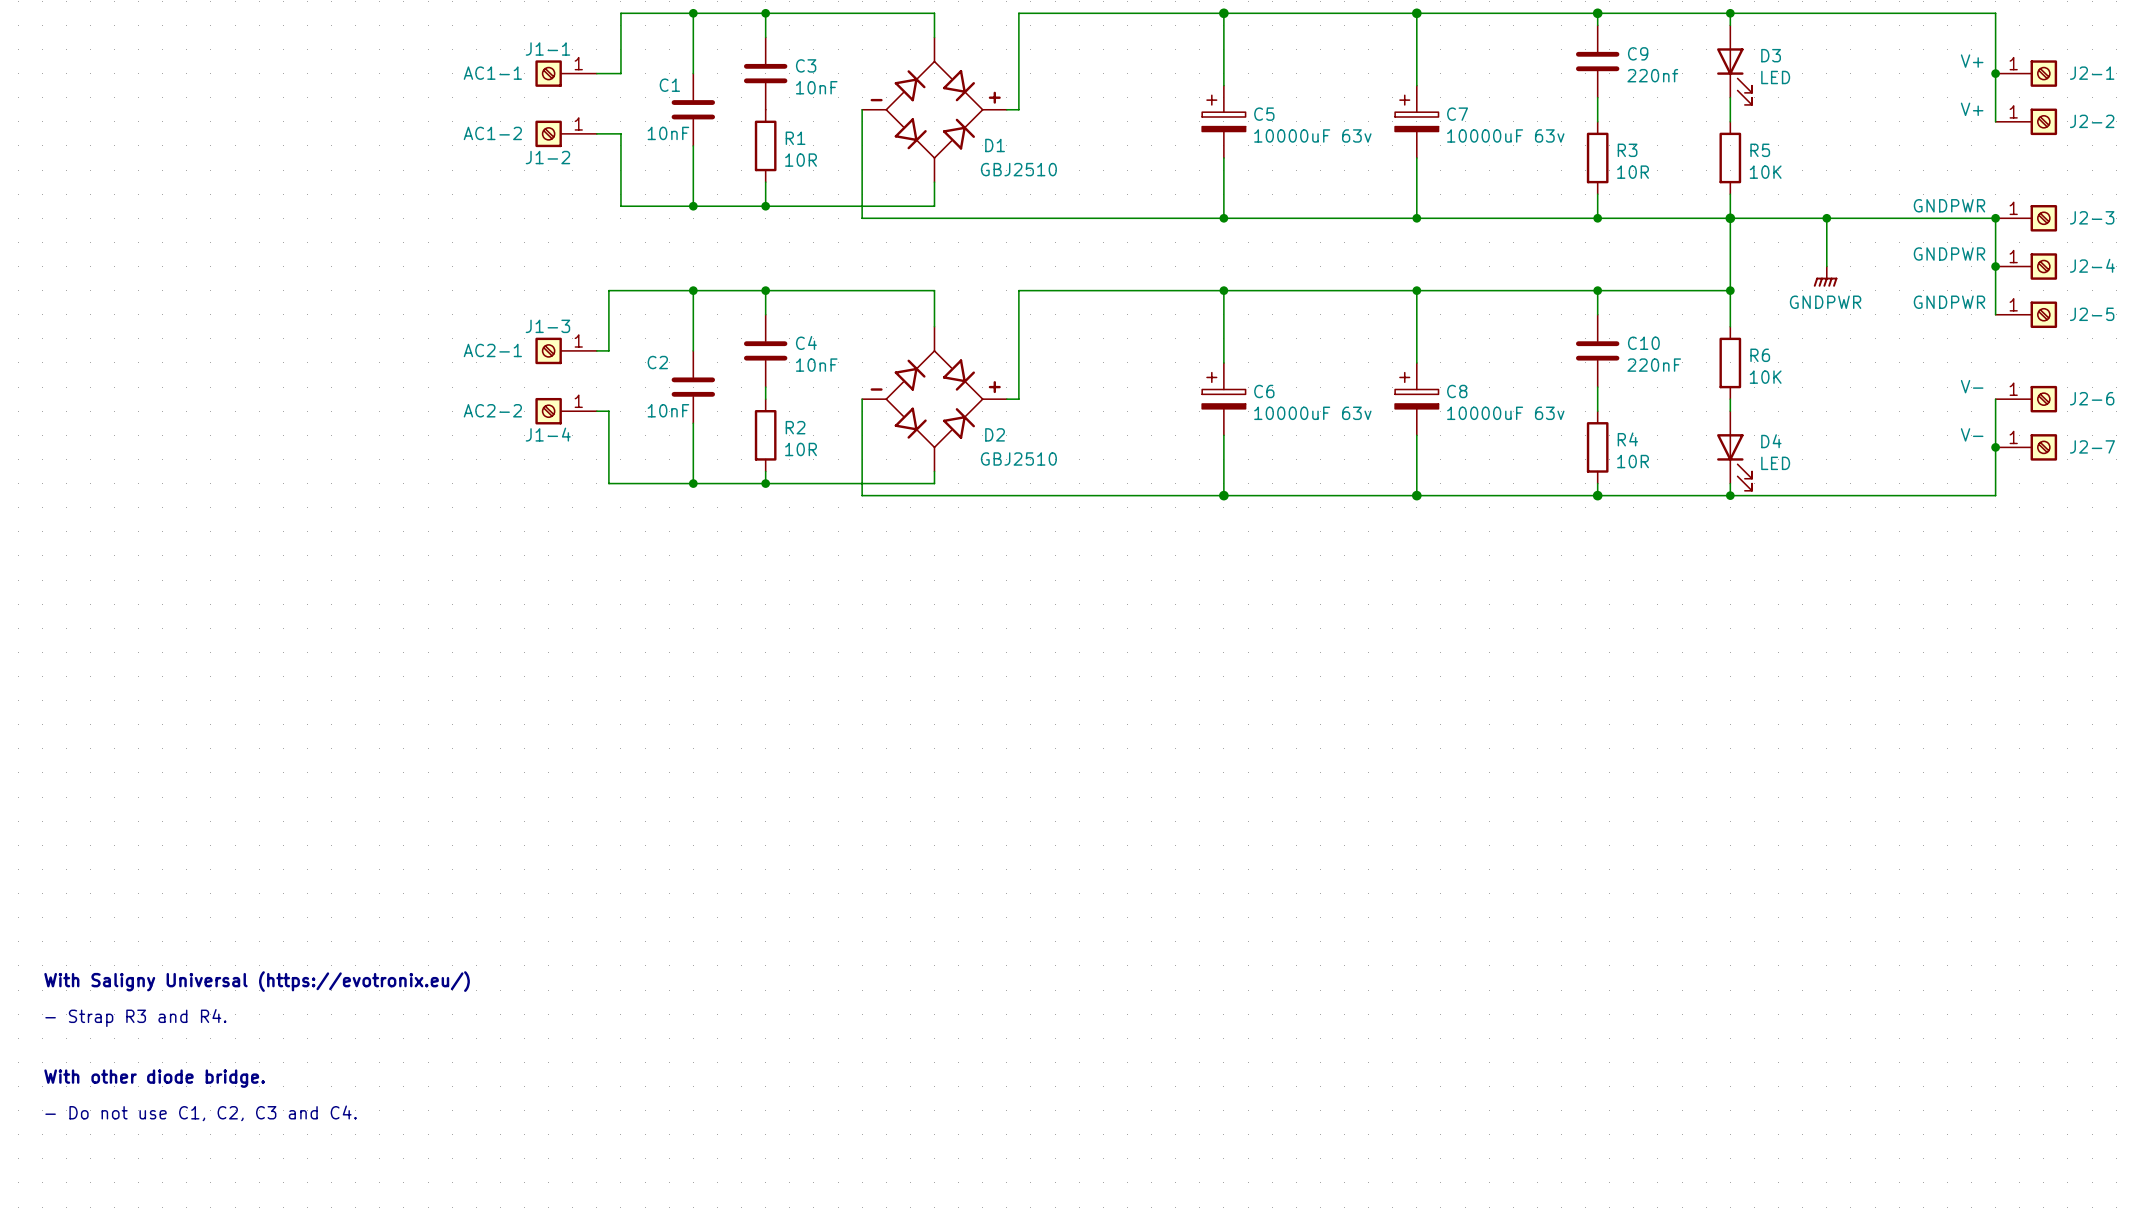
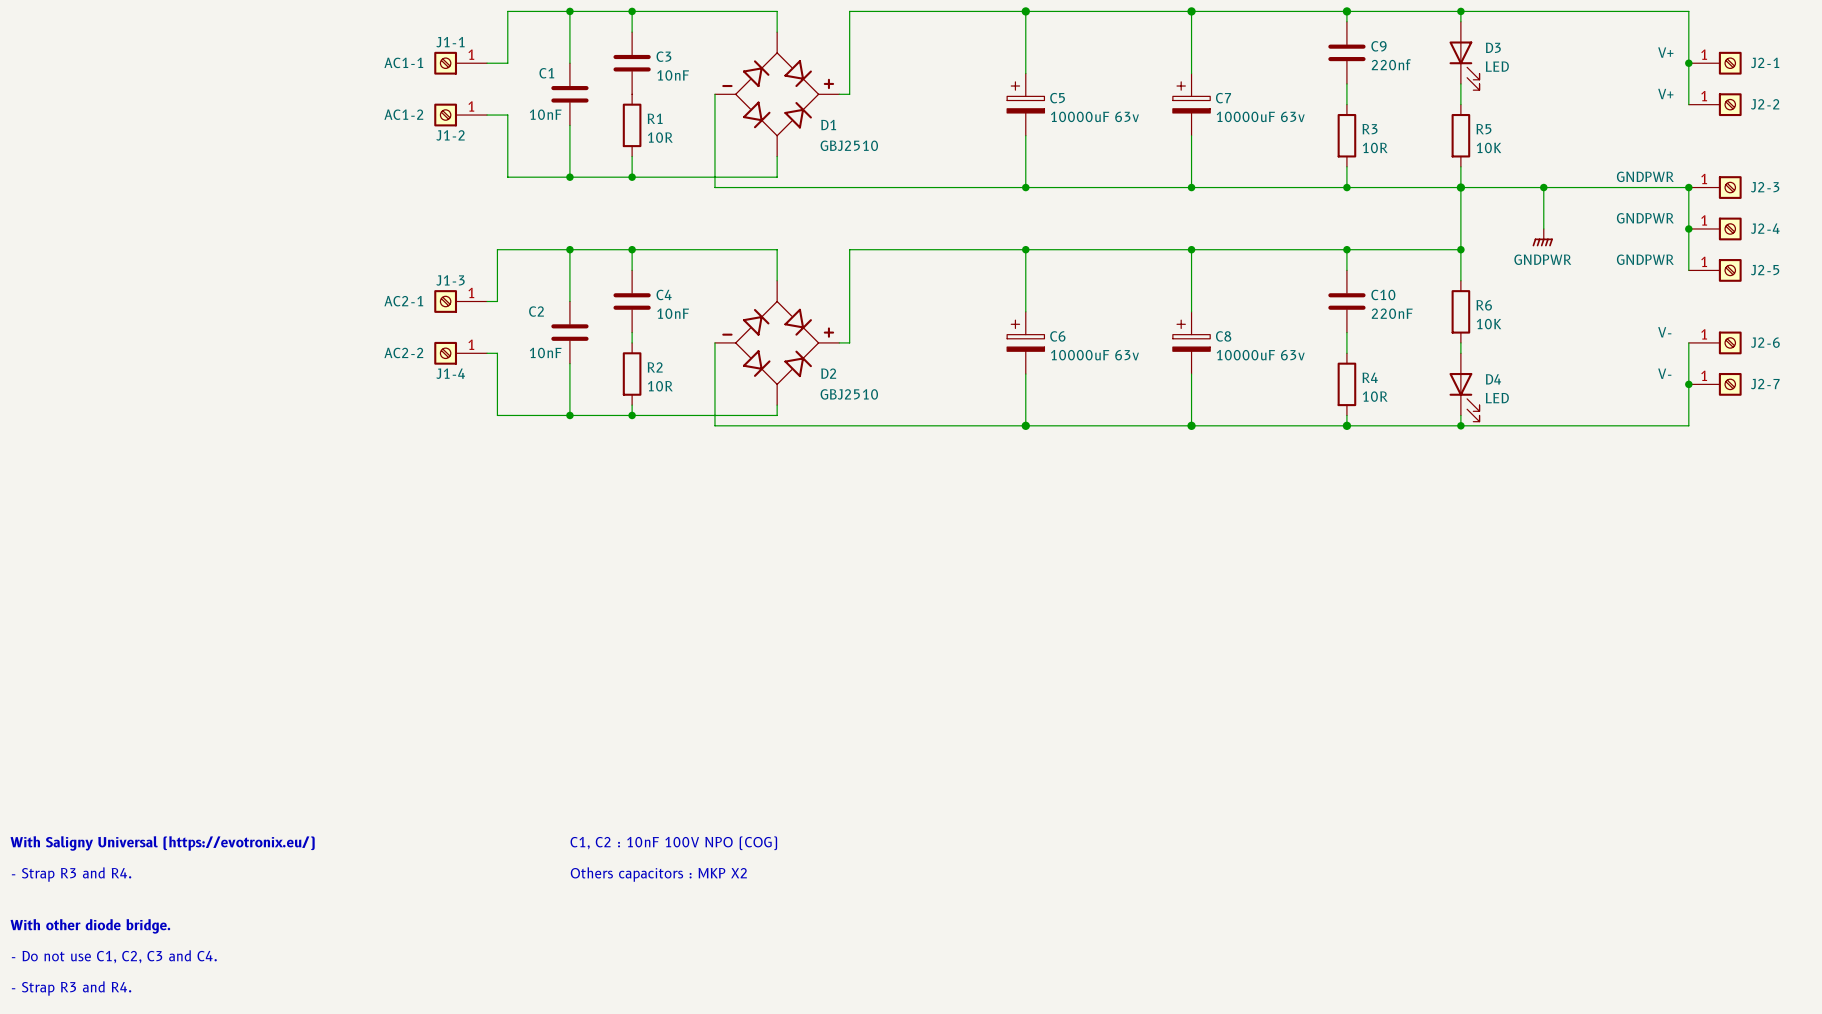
text: none -> C1, C2 : 10nF 100V NPO (COG) (673, 843)
text: none -> Others capacitors : MKP X2 (658, 874)
text: none -> - Strap R3 and R4. (71, 988)

